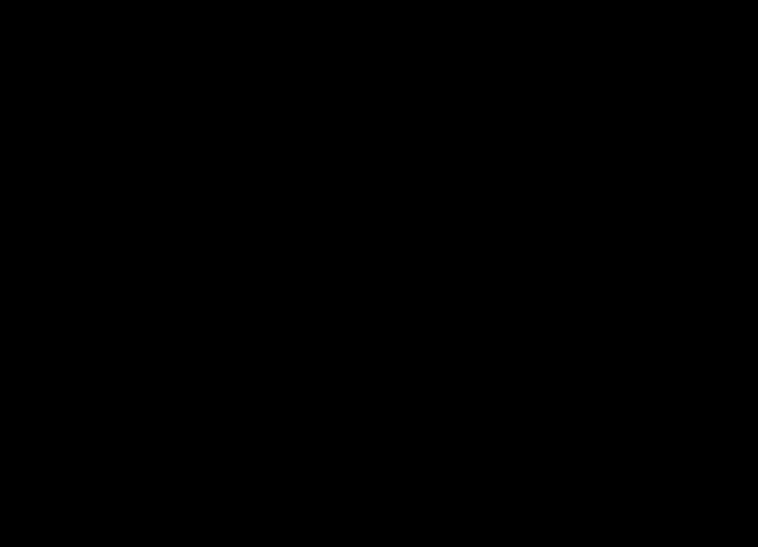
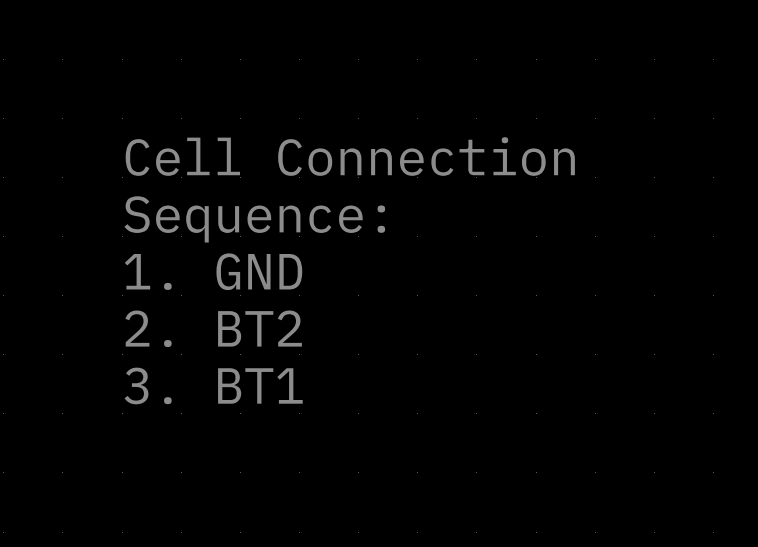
text: none -> Cell Connection (350, 156)
text: none -> Sequence: (254, 219)
text: none -> 1. GND (213, 271)
text: none -> 2. BT2 (213, 328)
text: none -> 3. BT1 (213, 385)

